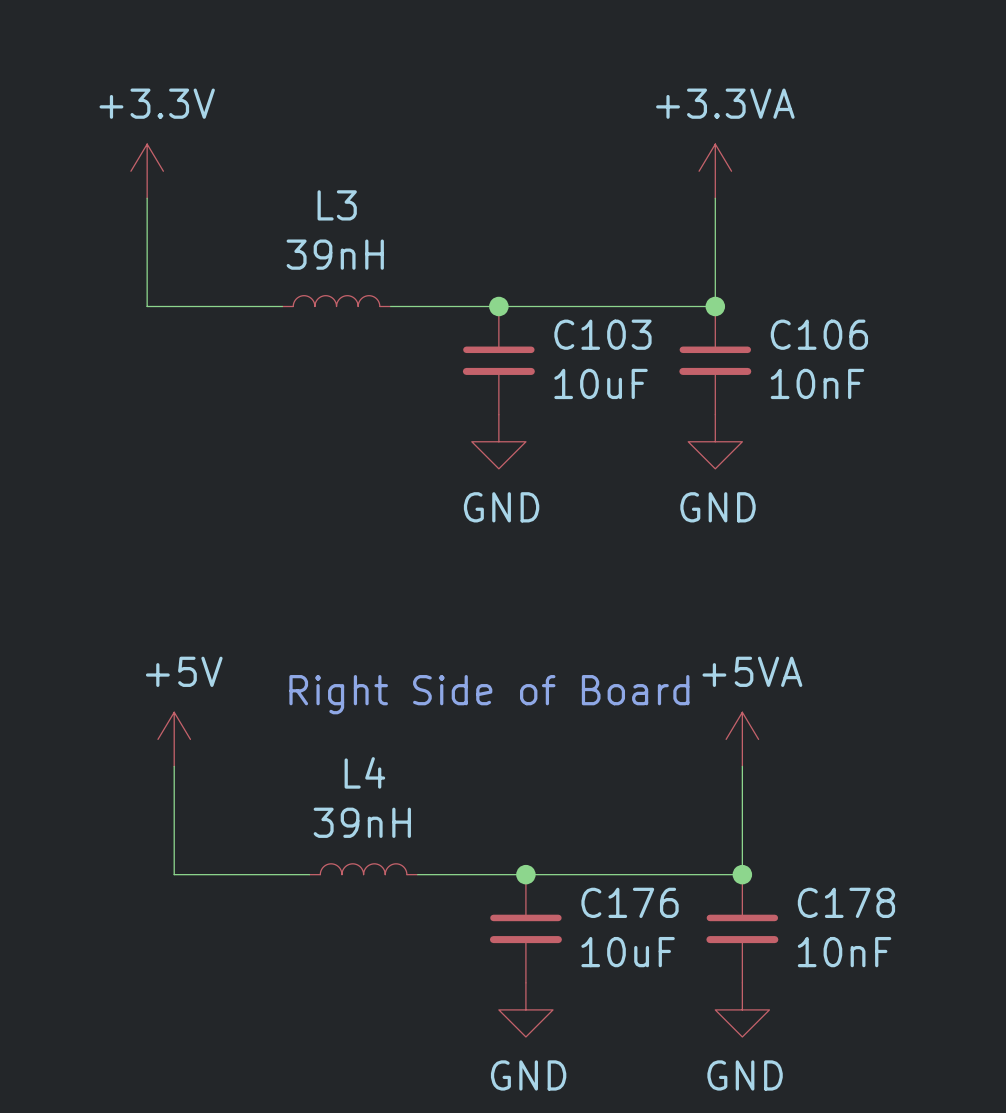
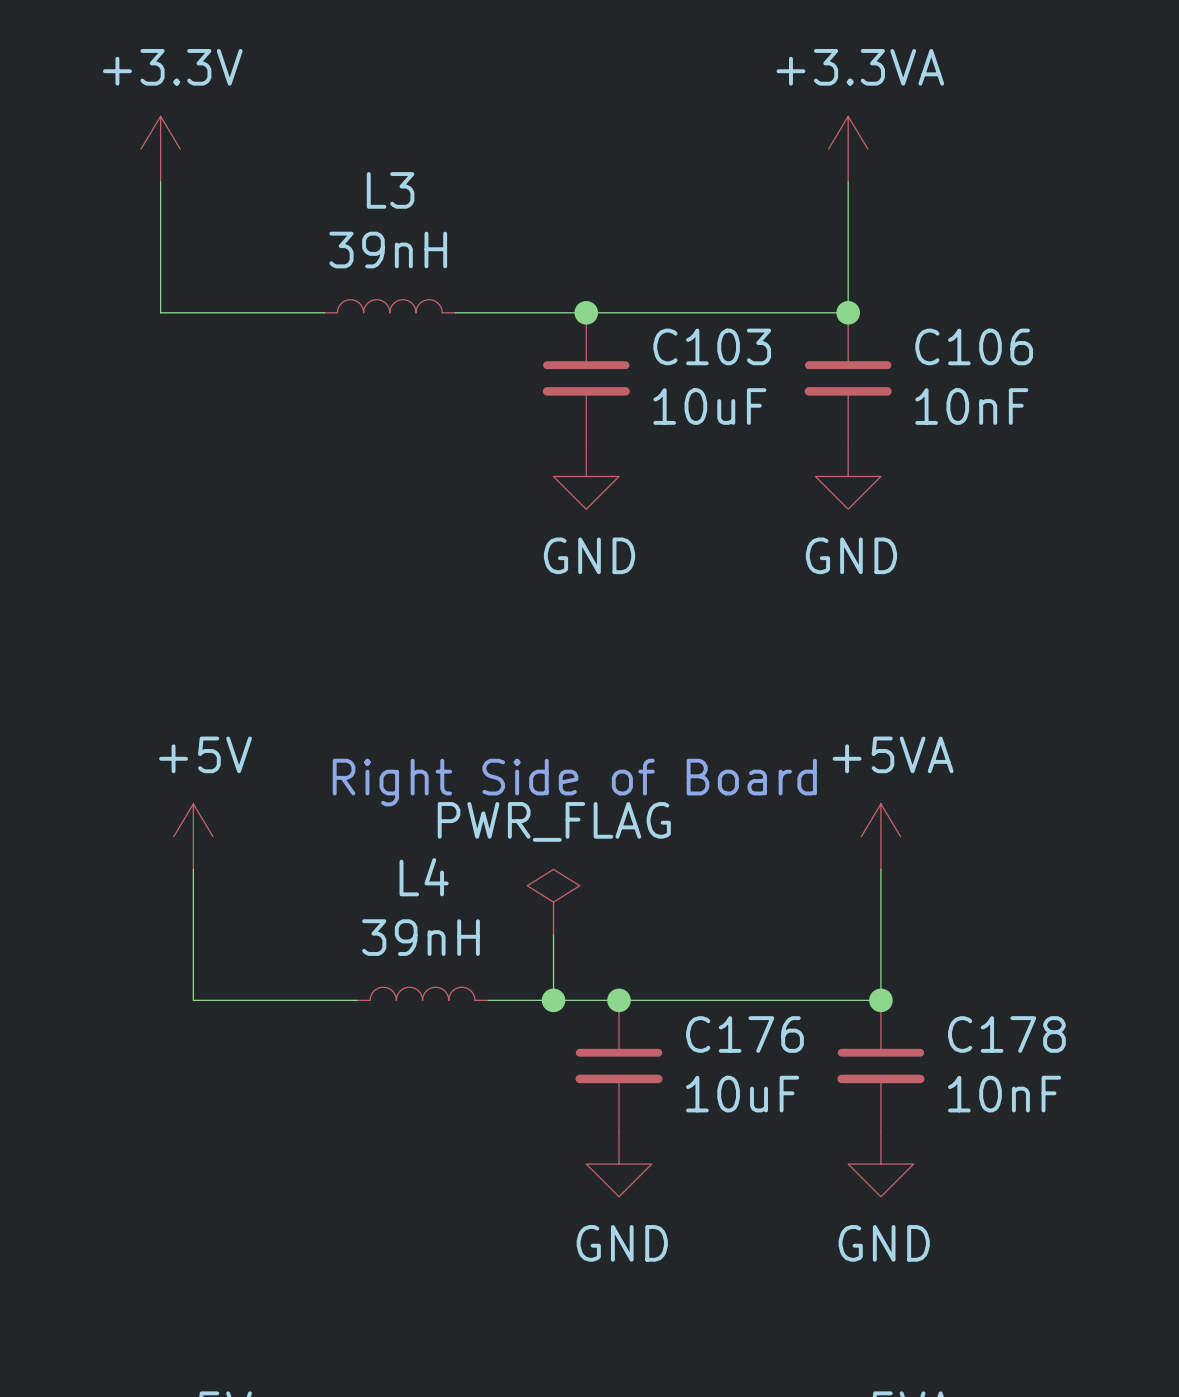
power symbol: none -> PWR_FLAG (553, 902)
wire: none -> (553, 934) (553, 1000)
junction: none -> (553, 1000)

